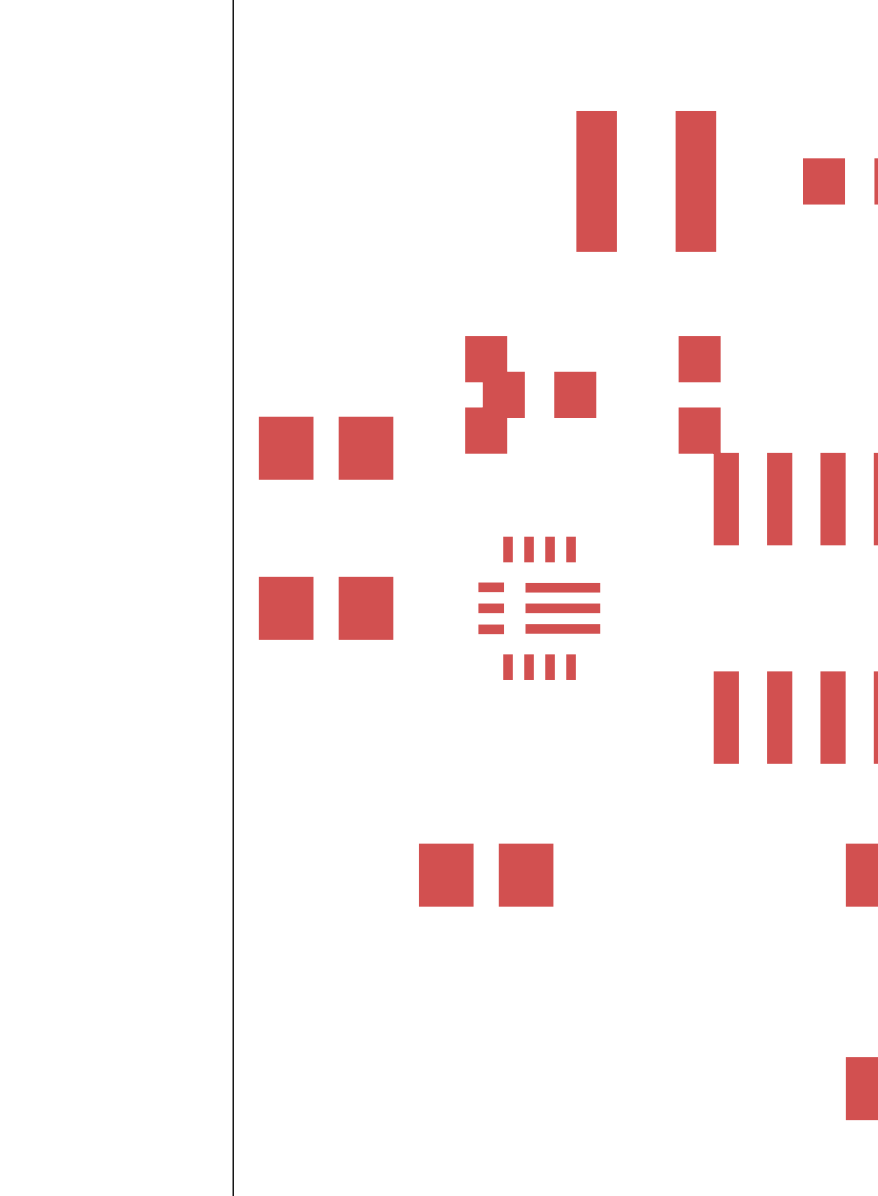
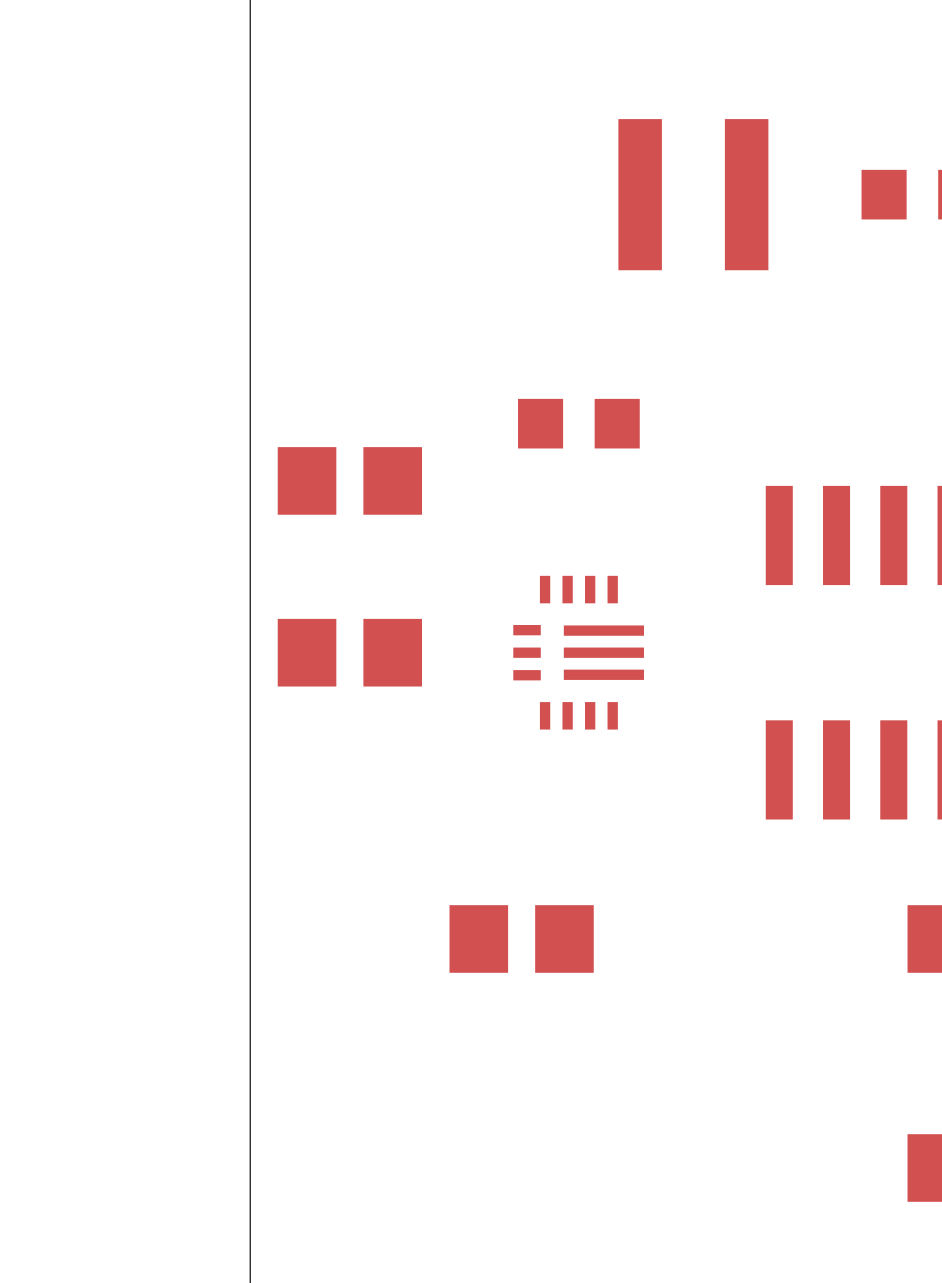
part: (486, 394) -> none
part: (699, 394) -> none

